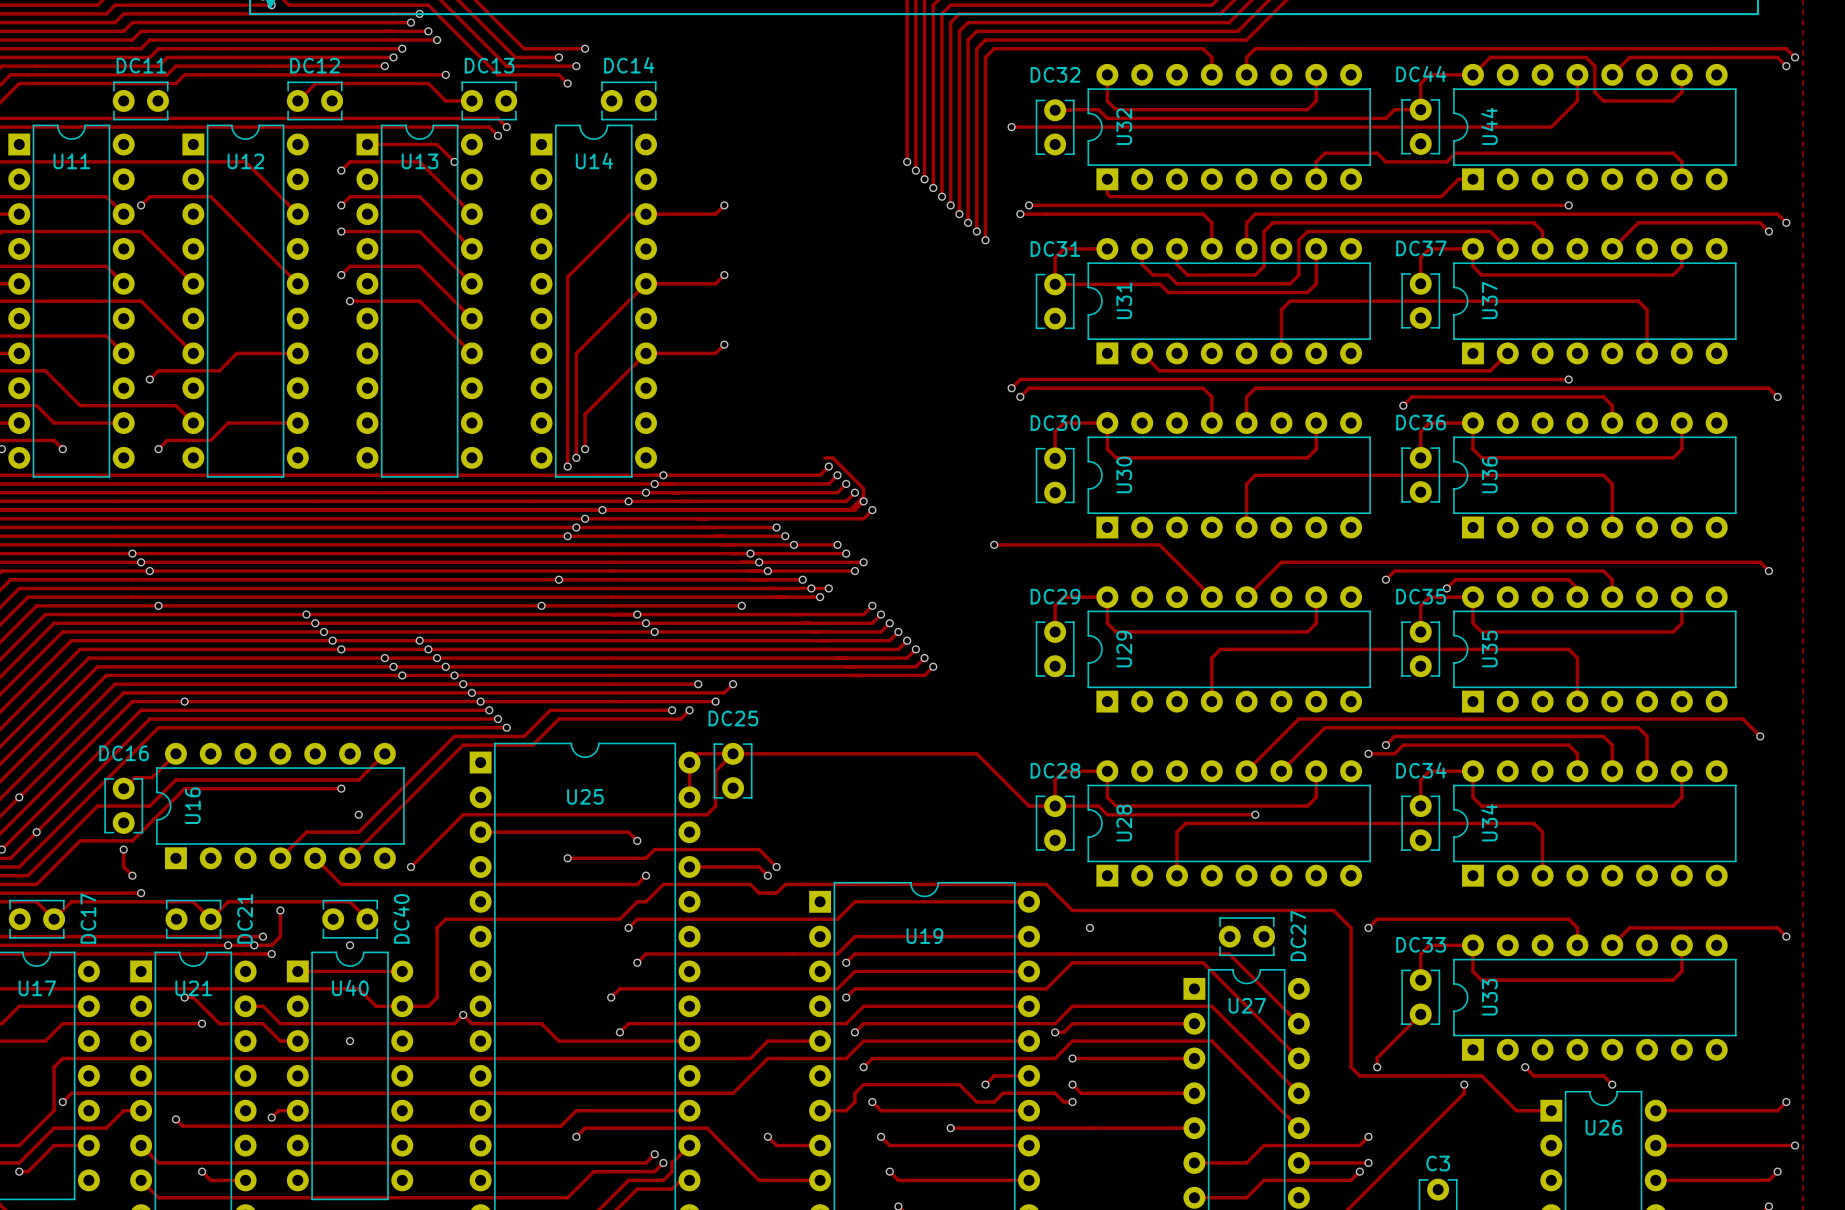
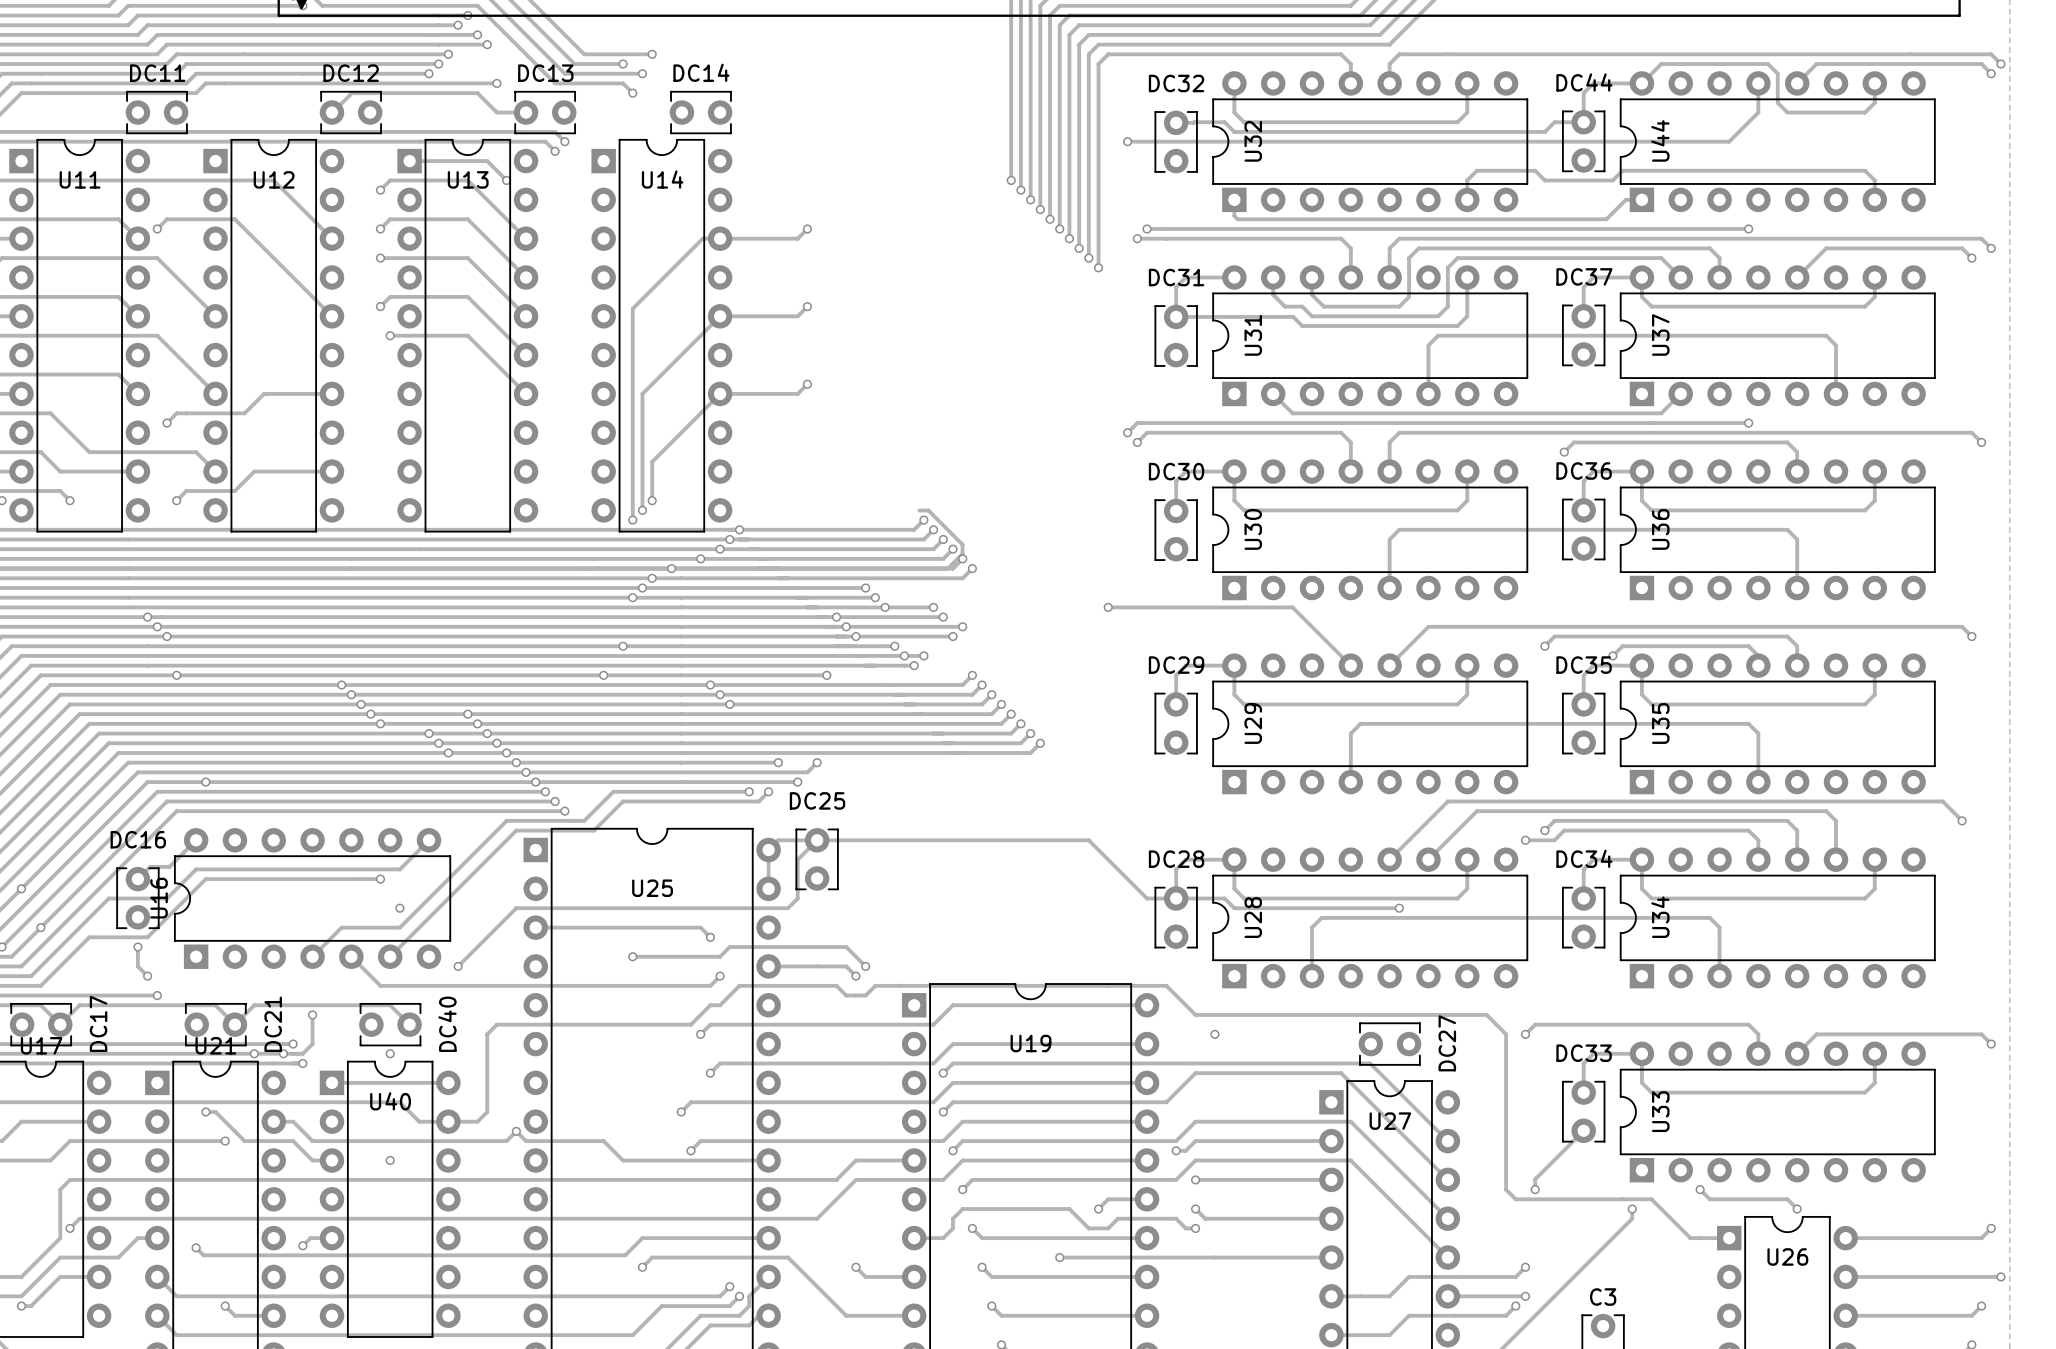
U16 name position: U16 (192, 805) -> U16 (159, 898)
U17 name position: U17 (37, 988) -> U17 (41, 1045)
U21 name position: U21 (193, 988) -> U21 (215, 1045)

